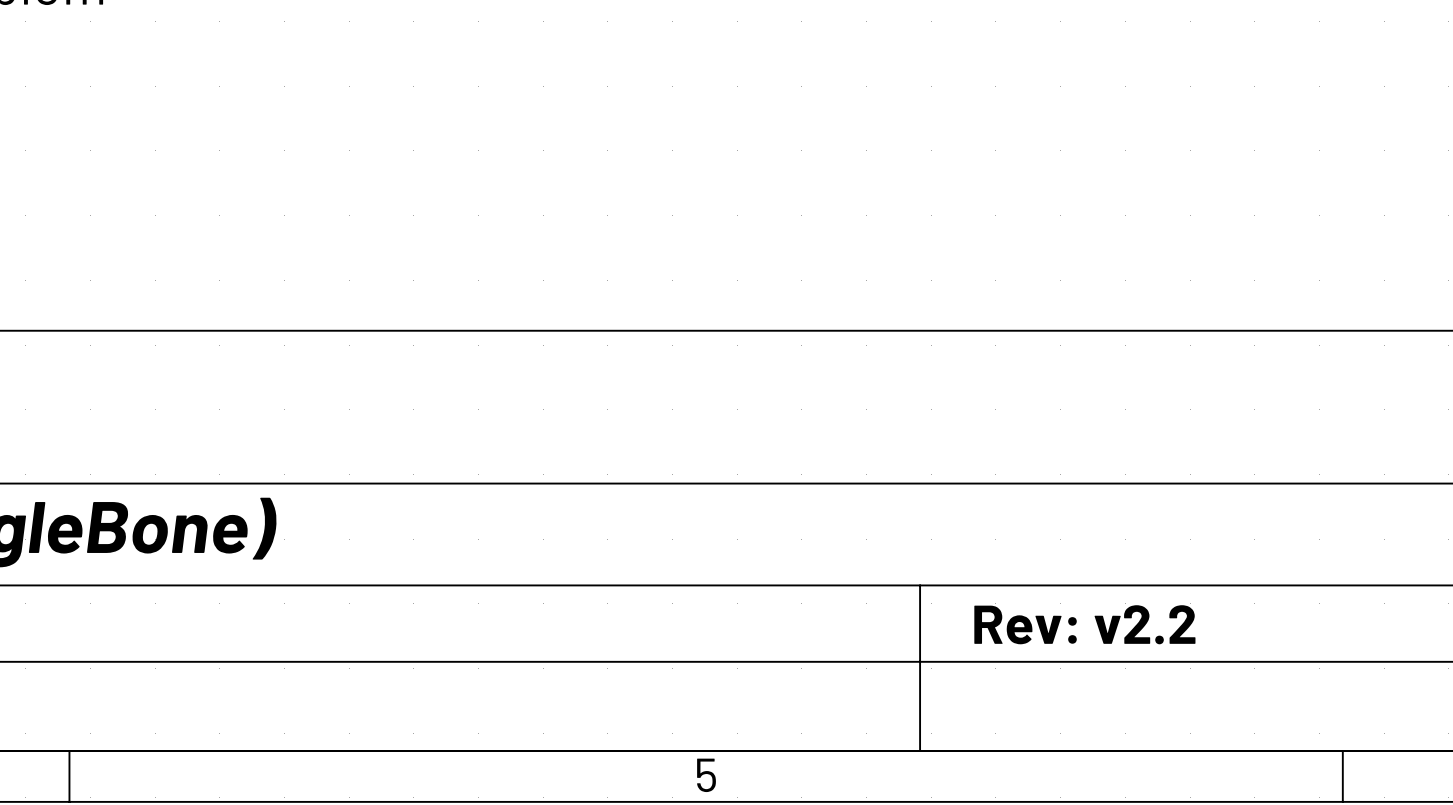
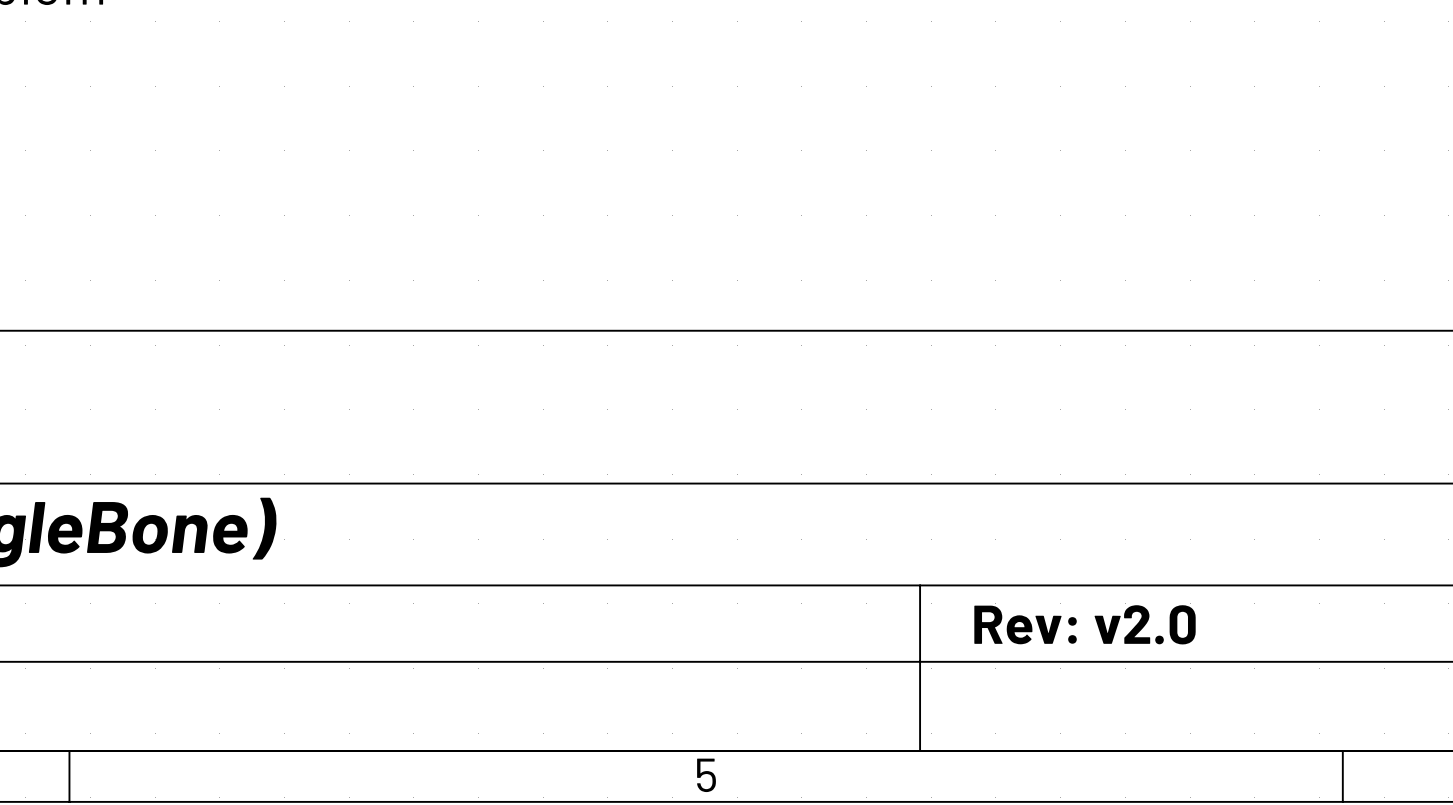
title block: Rev: v2.2 (1084, 624) -> Rev: v2.0 (1085, 624)

